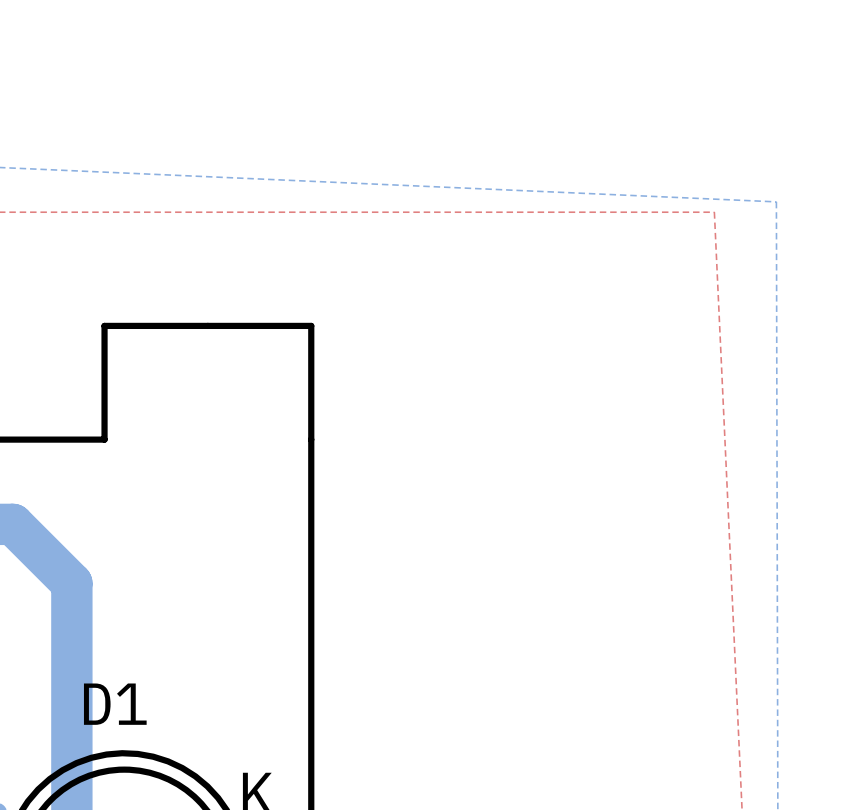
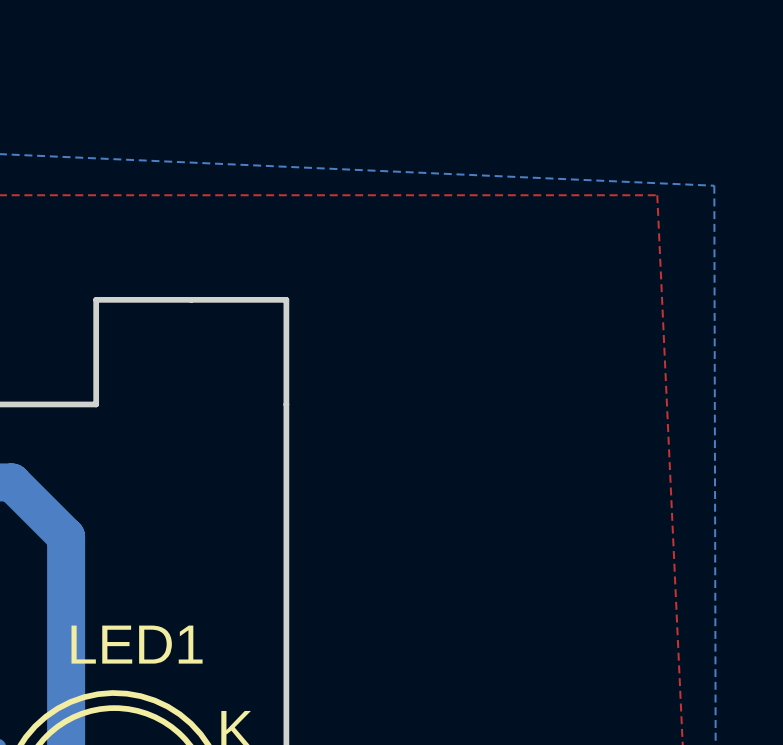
D1 name: D1 (115, 704) -> LED1 (137, 644)

